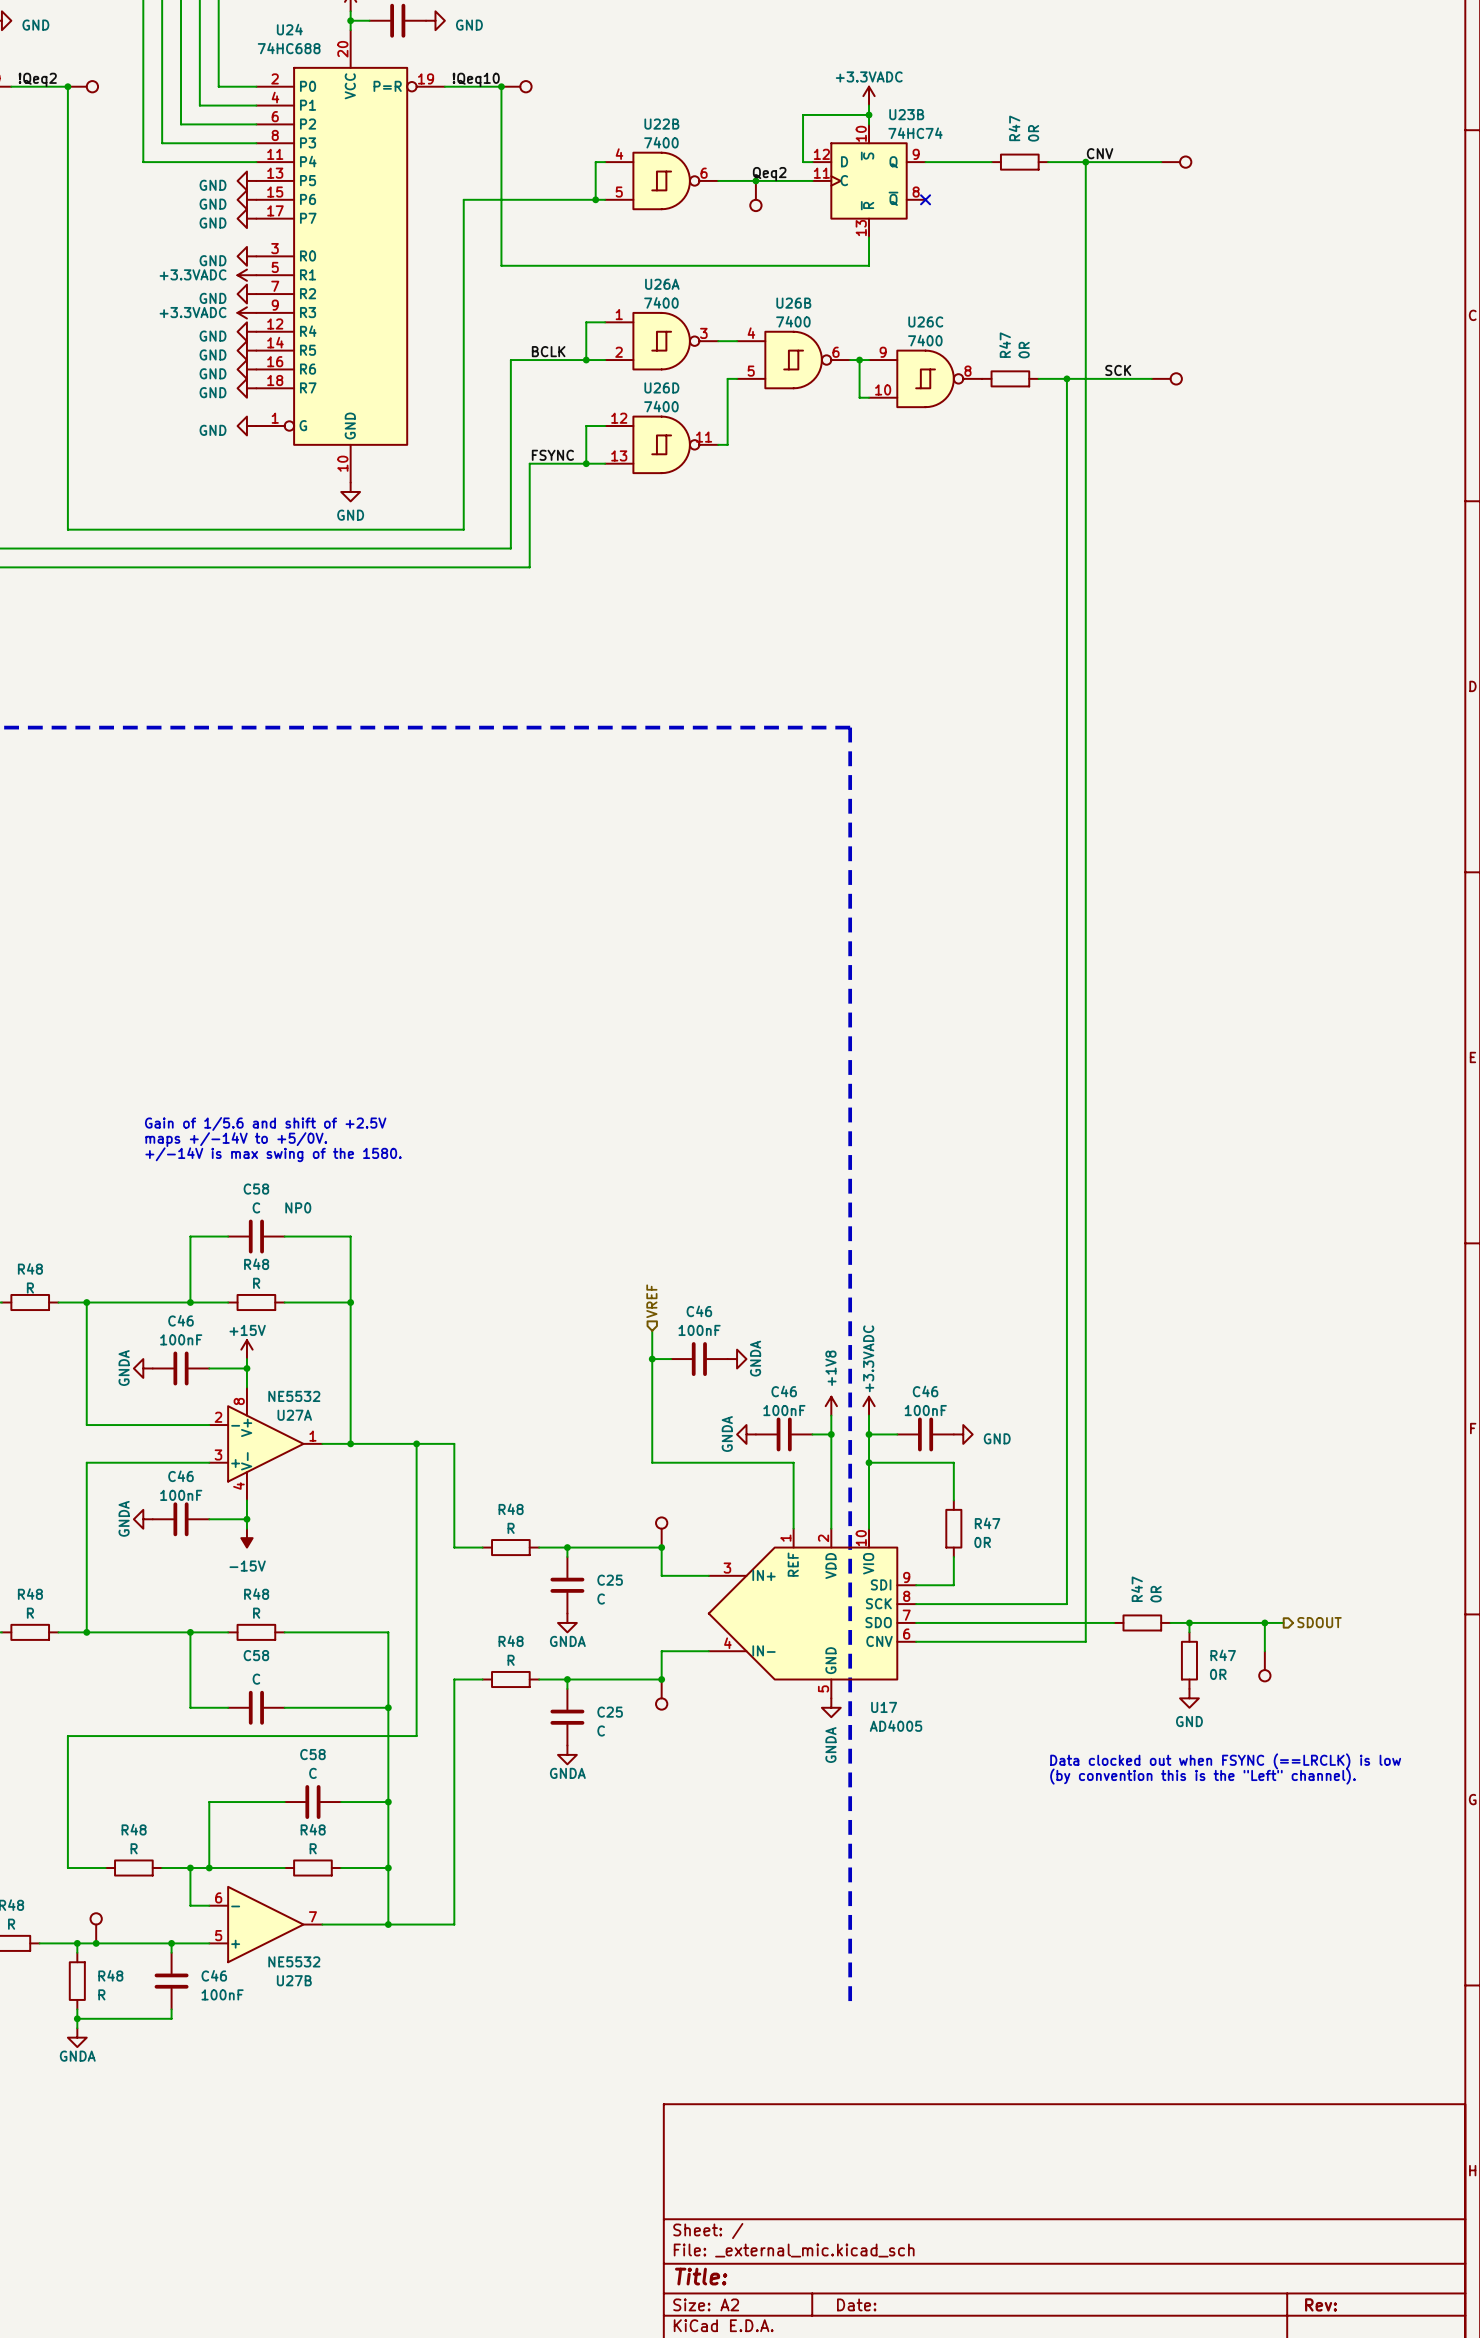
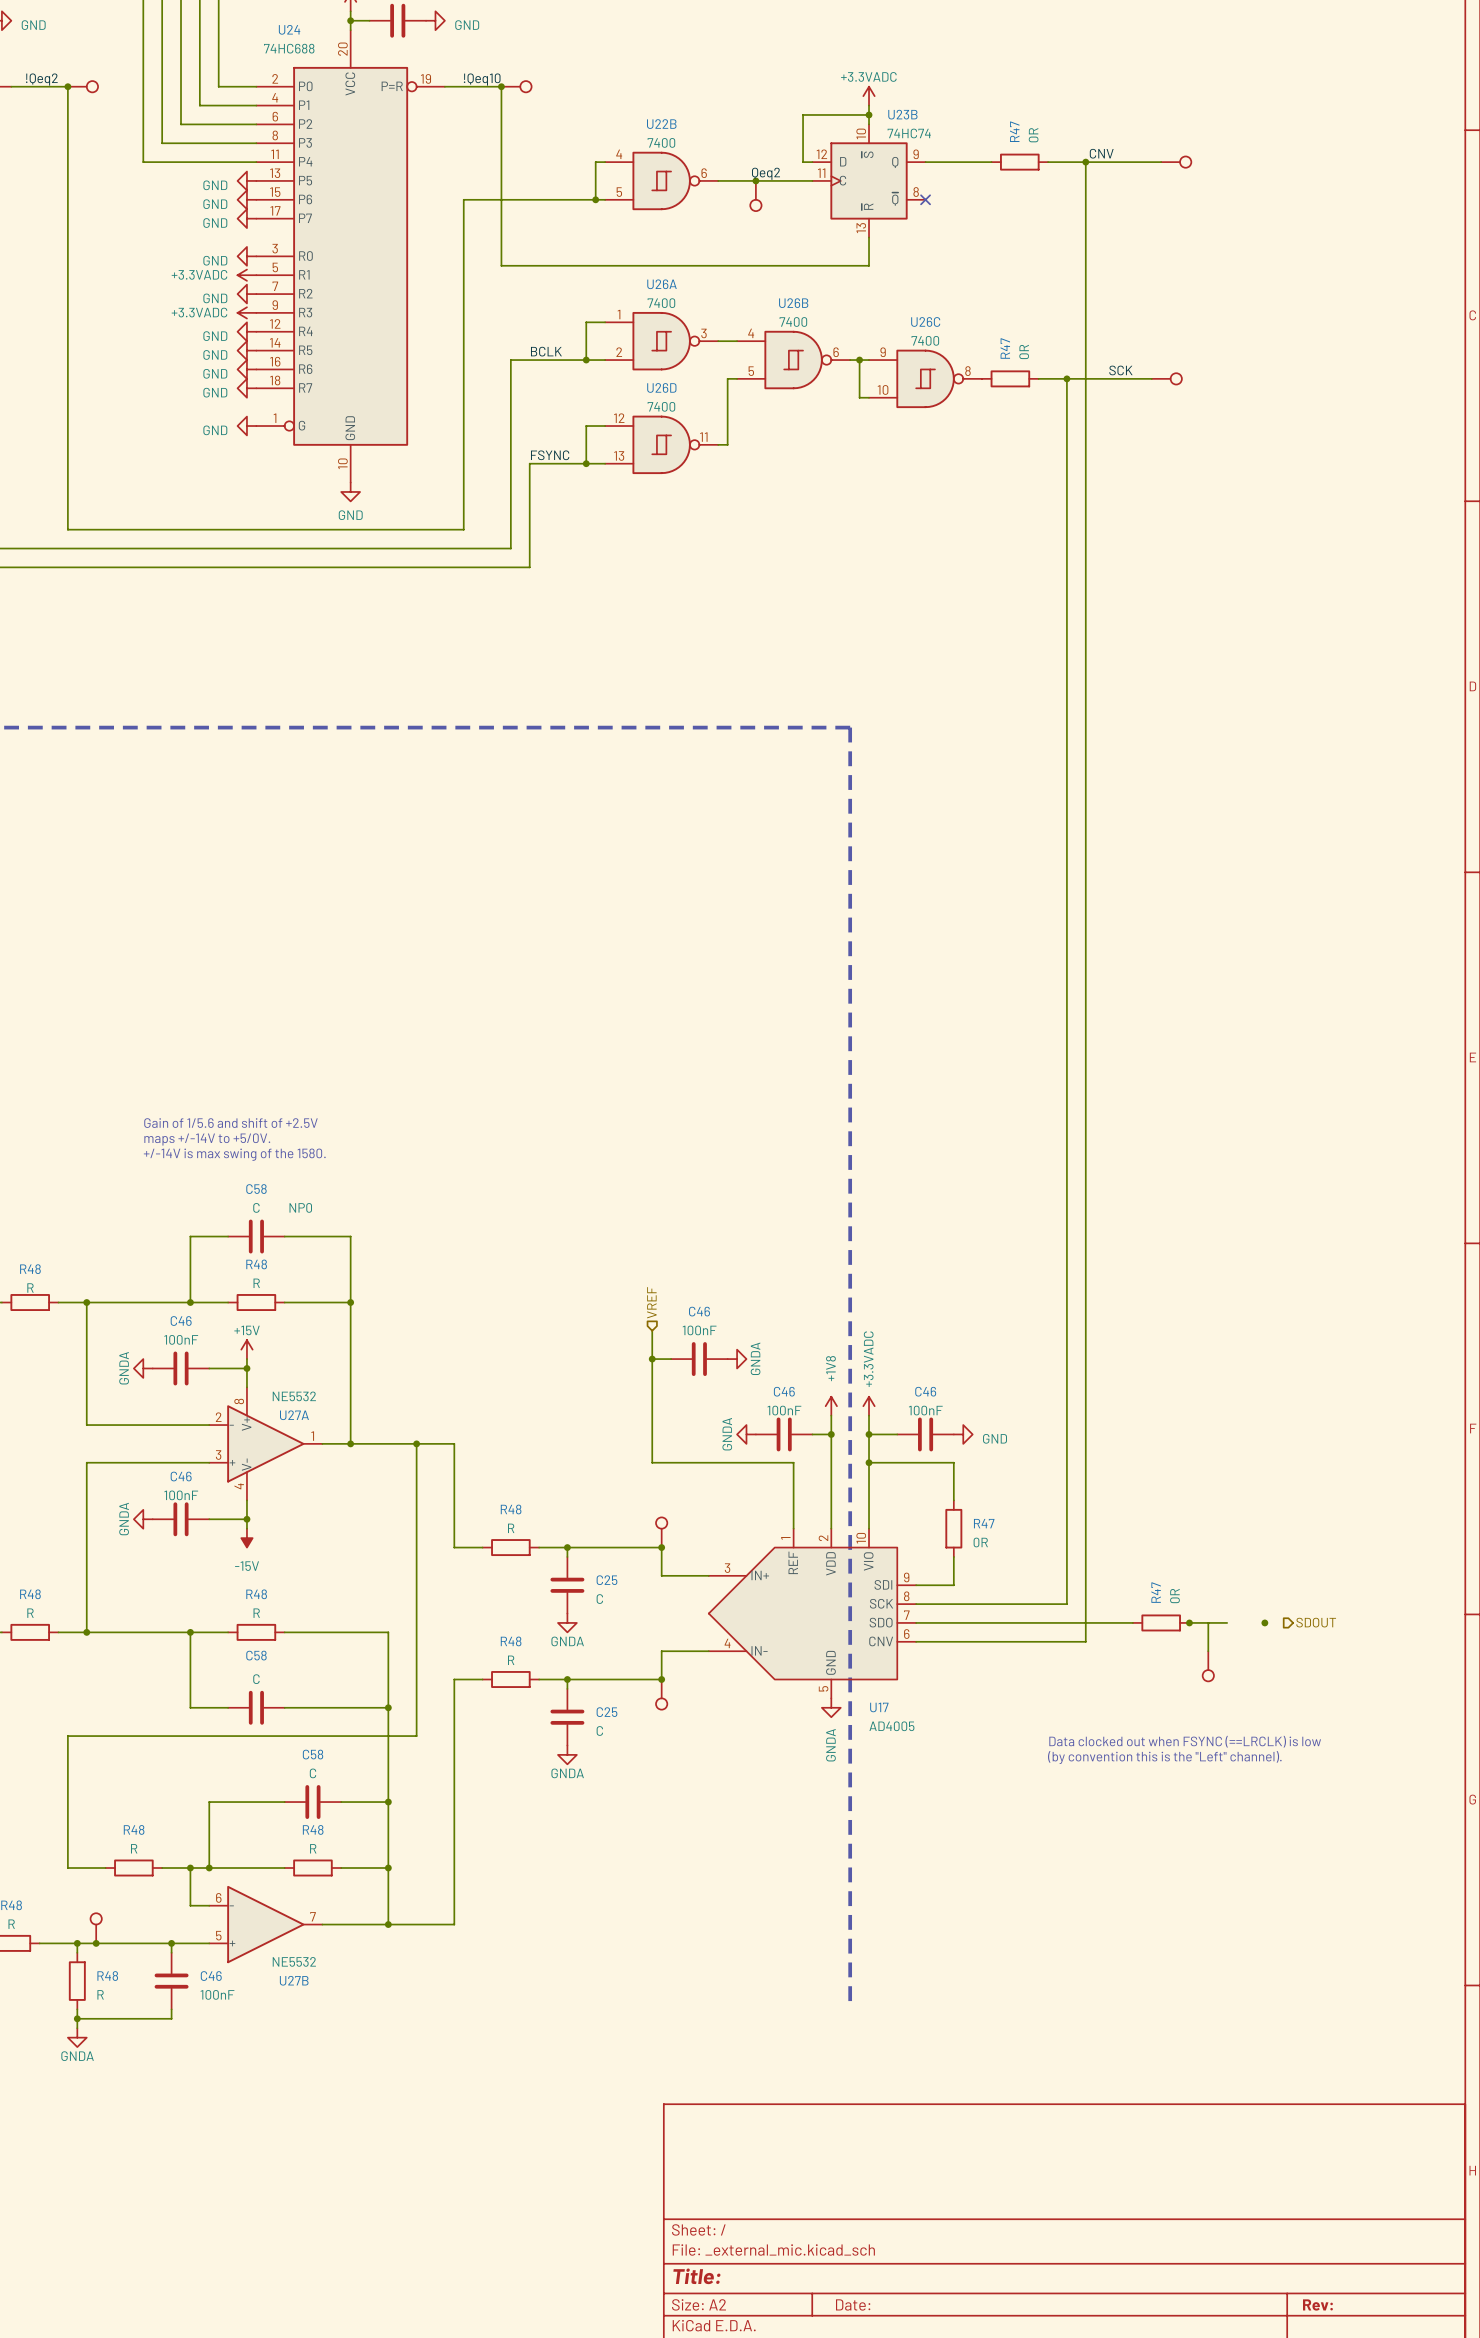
R47 position: (1142, 1622) -> (1161, 1622)
wire: (1170, 1622) (1189, 1622) (1189, 1632) -> none
wire: (1227, 1622) (1283, 1622) -> none
wire: (1264, 1622) (1264, 1651) -> (1208, 1622) (1208, 1651)
R47: 0R (1189, 1660) -> none
part position: (1264, 1666) -> (1208, 1666)
power symbol: GND (1189, 1698) -> none
text position: Data clocked out when FSYNC (==LRCLK) is low (1225, 1761) -> Data clocked out when FSYNC (==LRCLK) is low (1185, 1741)
text position: (by convention this is the "Left" channel). (1202, 1776) -> (by convention this is the "Left" channel). (1164, 1757)

